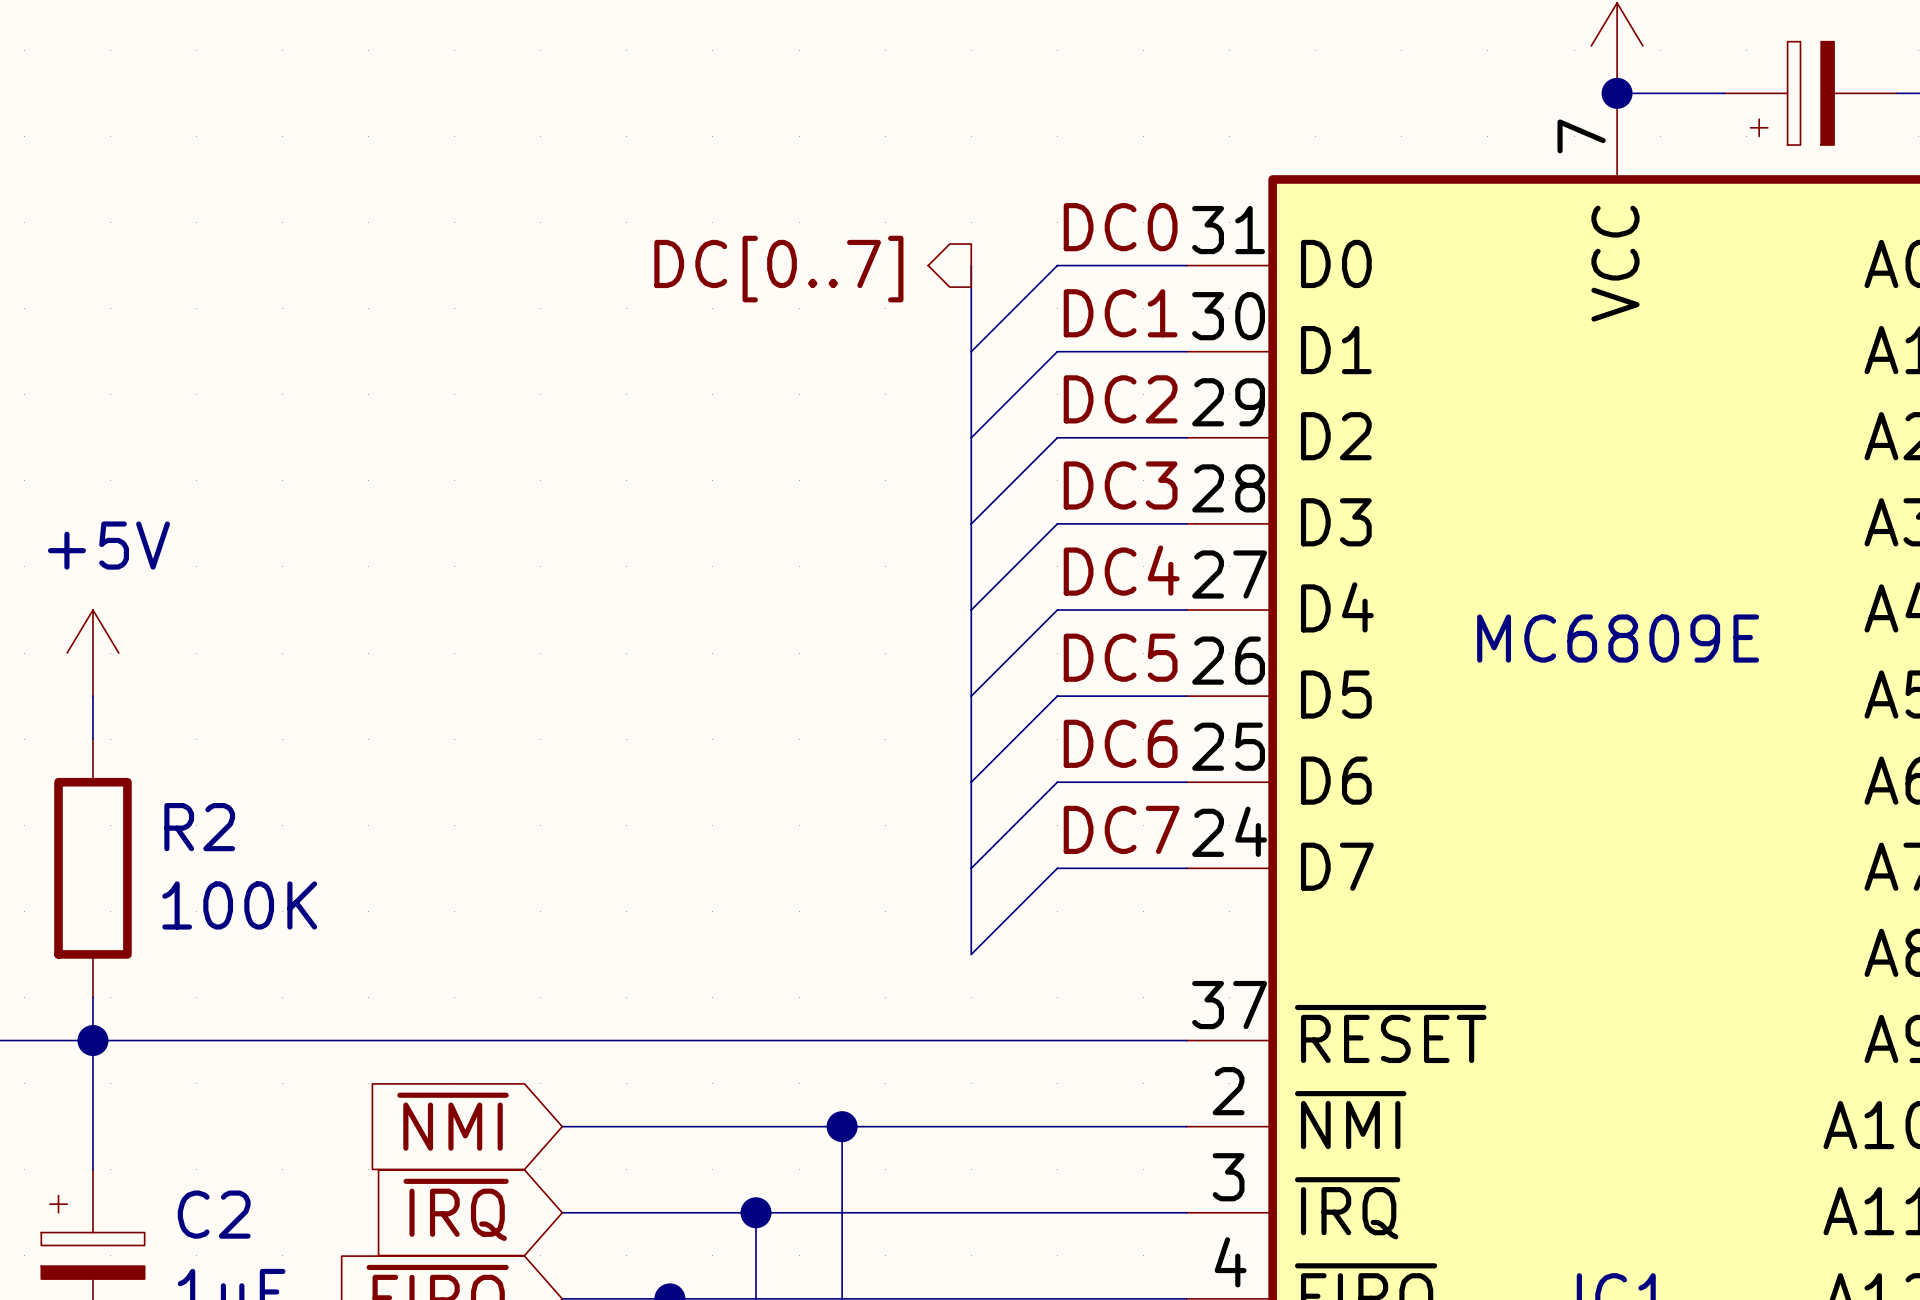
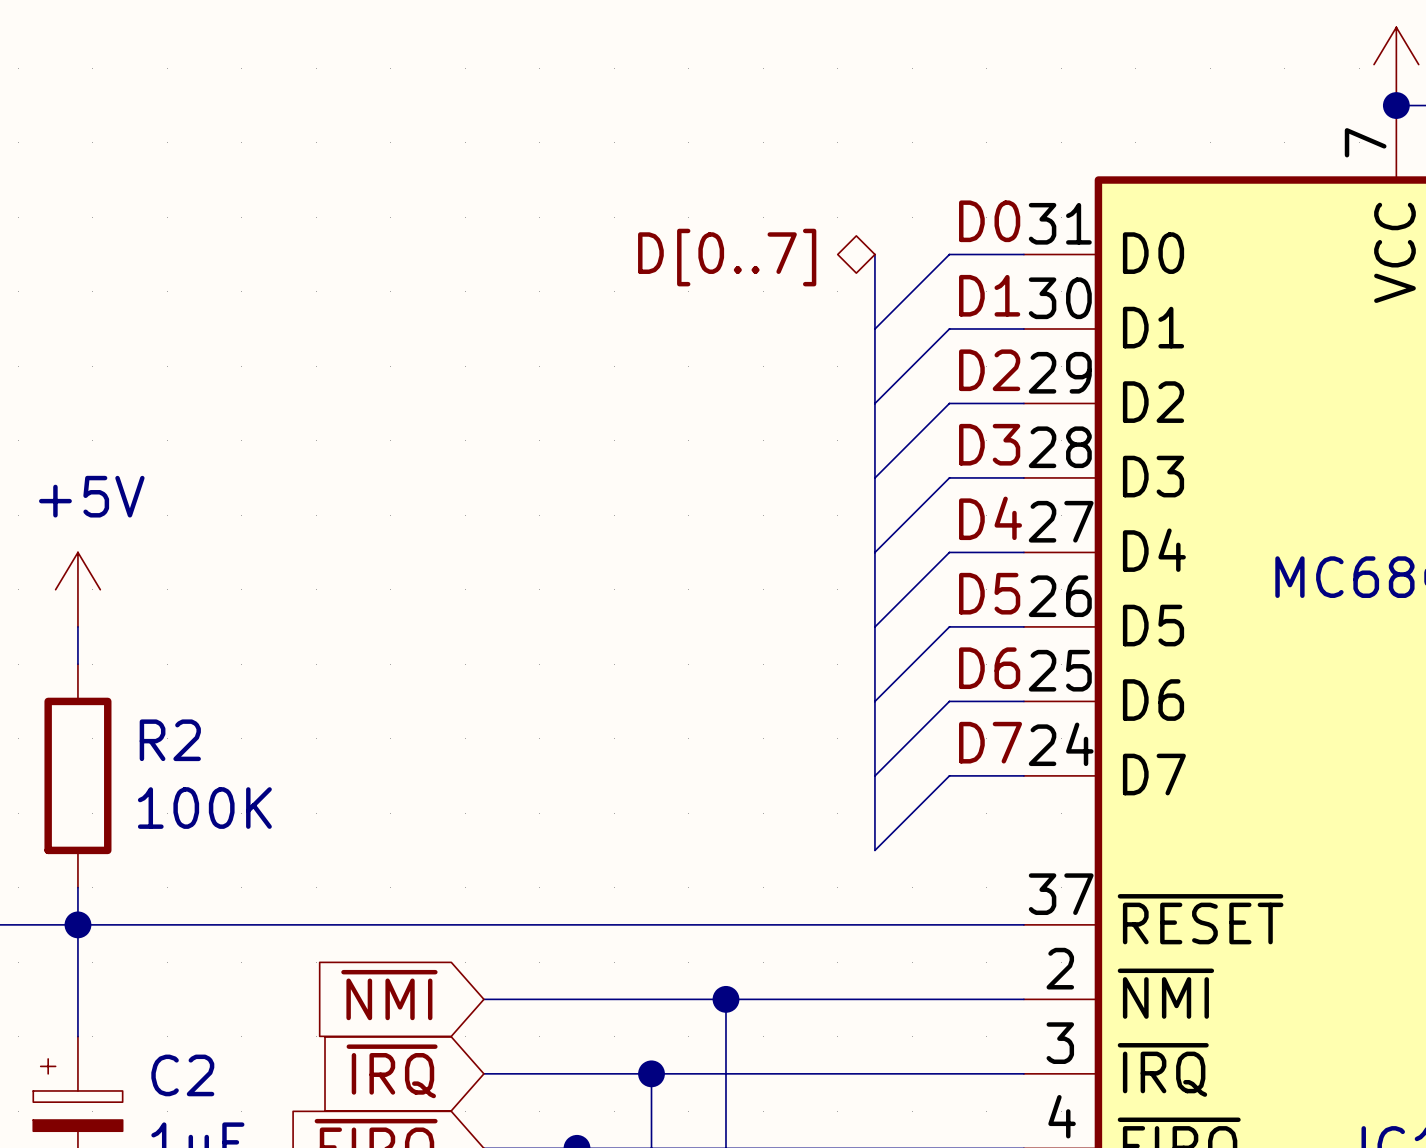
label: DC0 (1120, 227) -> D0 (989, 221)
bus: (971, 265) (971, 954) -> (874, 254) (874, 850)
wire: (1100, 265) (1057, 265) (971, 351) -> (949, 254) (874, 328)
hierarchical label shape: output (778, 269) -> bidirectional (727, 257)
hierarchical label: DC[0..7] (778, 269) -> D[0..7] (727, 257)
label: DC1 (1120, 313) -> D1 (989, 295)
wire: (1100, 351) (1057, 351) (971, 437) -> (949, 328) (874, 403)
label: DC2 (1120, 399) -> D2 (989, 370)
wire: (1100, 437) (1057, 437) (971, 523) -> (949, 403) (874, 477)
label: DC3 (1120, 485) -> D3 (989, 444)
wire: (1100, 523) (1057, 523) (971, 610) -> (949, 477) (874, 552)
label: DC4 (1121, 570) -> D4 (990, 518)
wire: (1100, 610) (1057, 610) (971, 696) -> (949, 552) (874, 626)
label: DC5 (1120, 657) -> D5 (989, 593)
wire: (1100, 696) (1057, 696) (971, 782) -> (949, 626) (874, 701)
label: DC6 (1120, 743) -> D6 (989, 668)
wire: (1100, 782) (1057, 782) (971, 868) -> (949, 701) (874, 775)
label: DC7 (1121, 829) -> D7 (990, 742)
wire: (1100, 868) (1057, 868) (971, 954) -> (949, 775) (874, 850)

